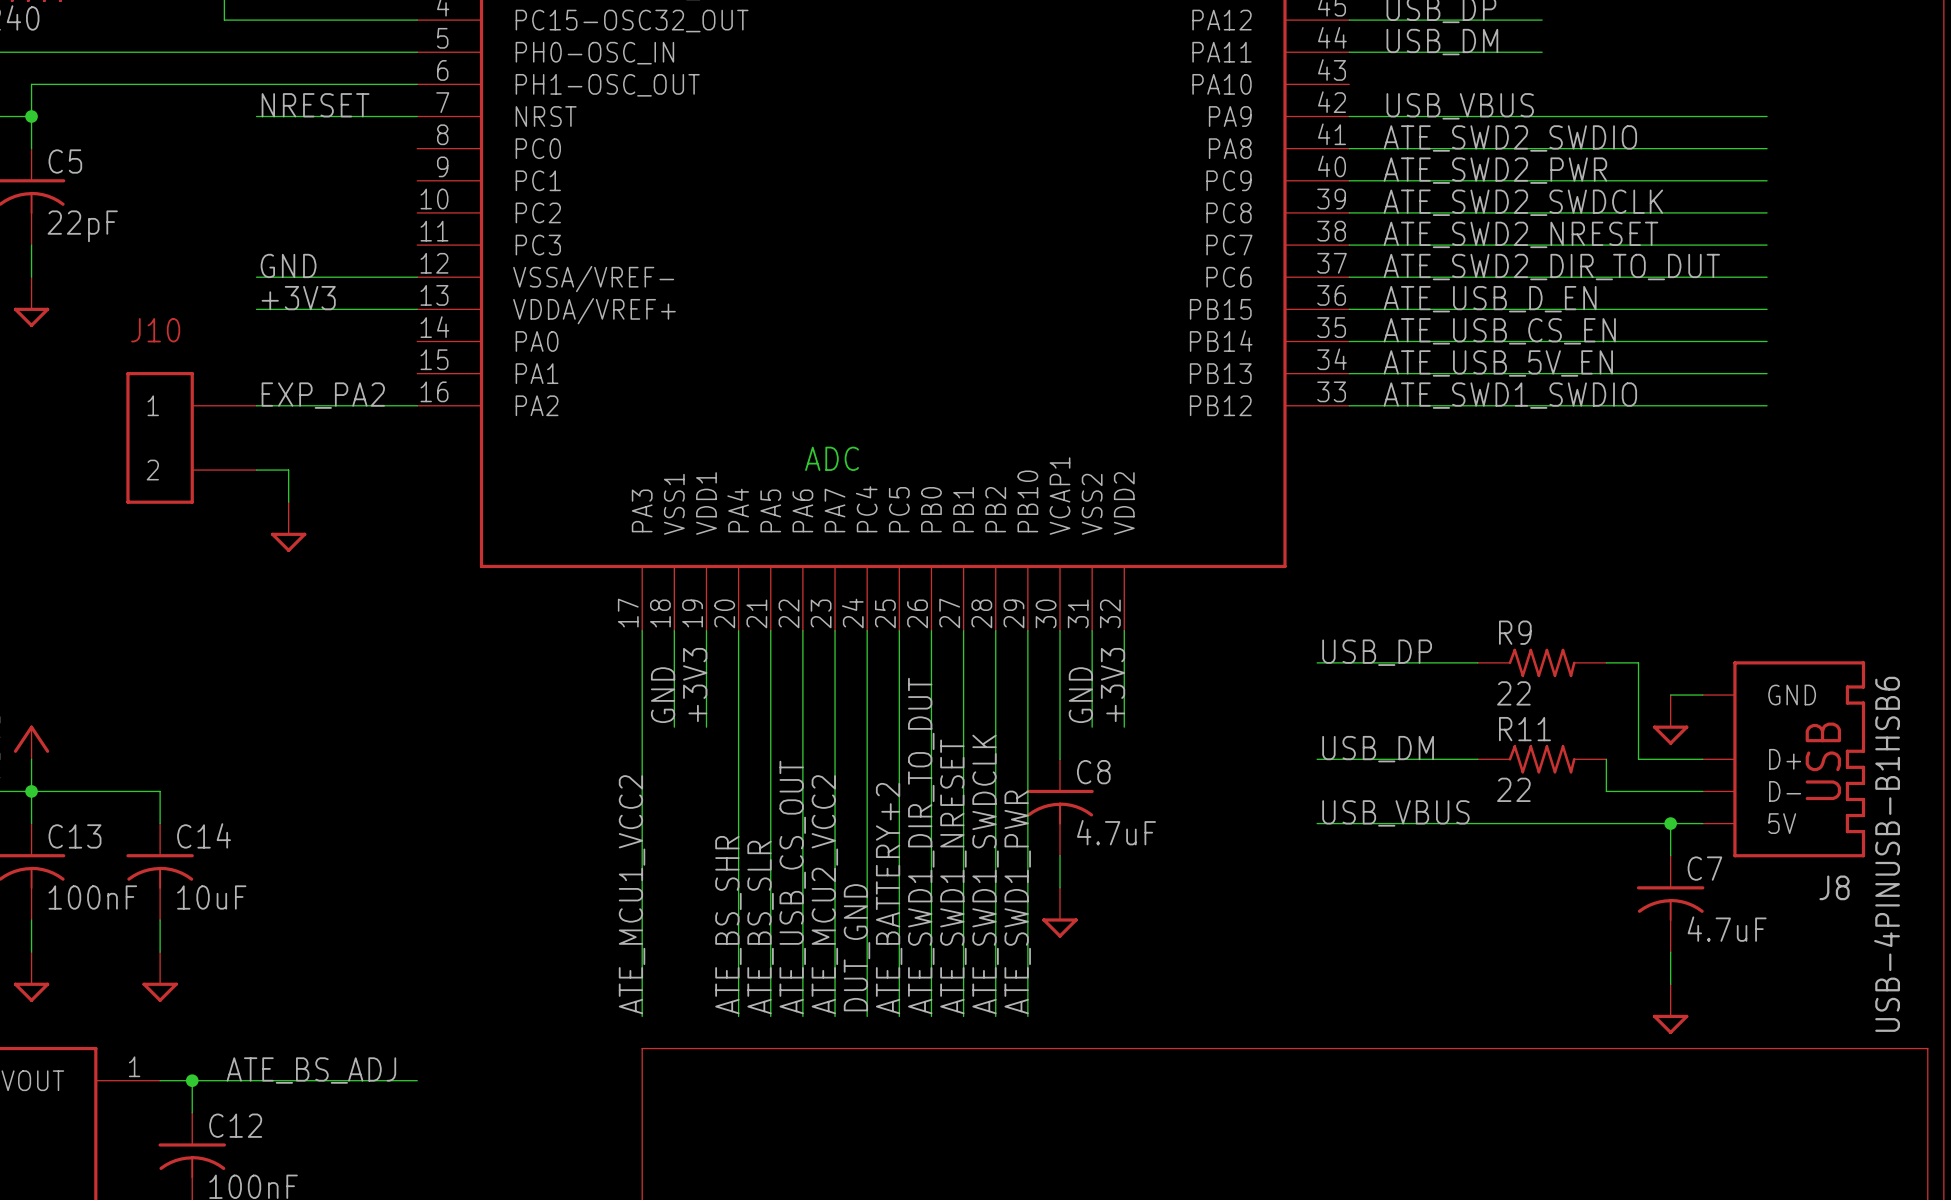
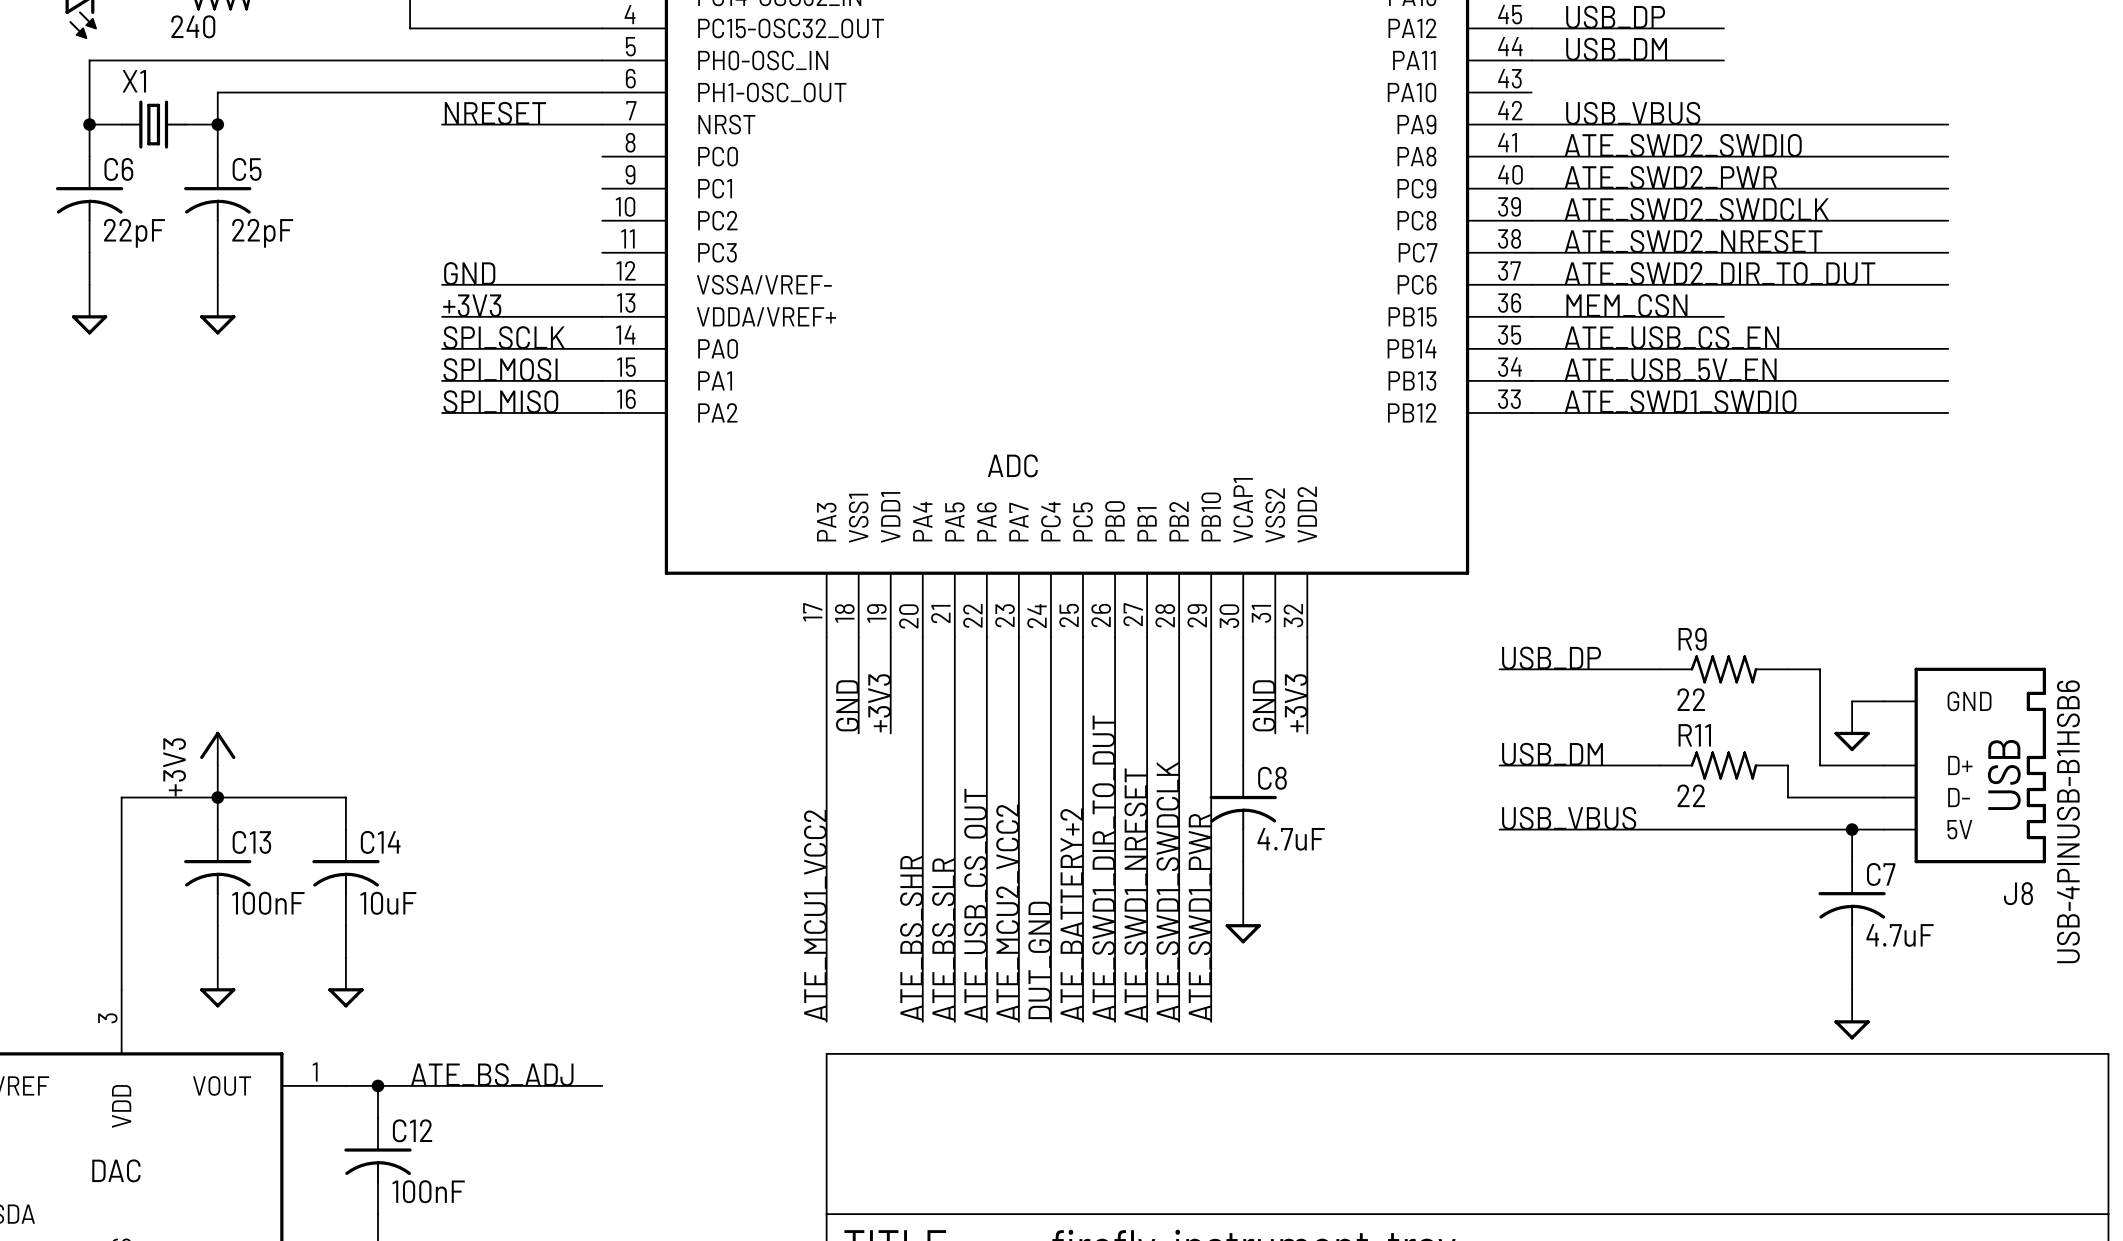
label: ATE_USB_D_EN (1490, 299) -> MEM_CSN (1626, 305)
wire: (1542, 309) (1767, 309) -> none
label: none -> SPI_SCLK (504, 337)
wire: none -> (442, 348) (602, 348)
label: none -> SPI_MOSI (500, 369)
wire: none -> (442, 380) (602, 380)
label: EXP_PA2 (323, 395) -> SPI_MISO (500, 401)
J10: (191, 437) -> none
wire: (256, 470) (288, 470) (288, 502) -> none
power symbol: (288, 527) -> none

